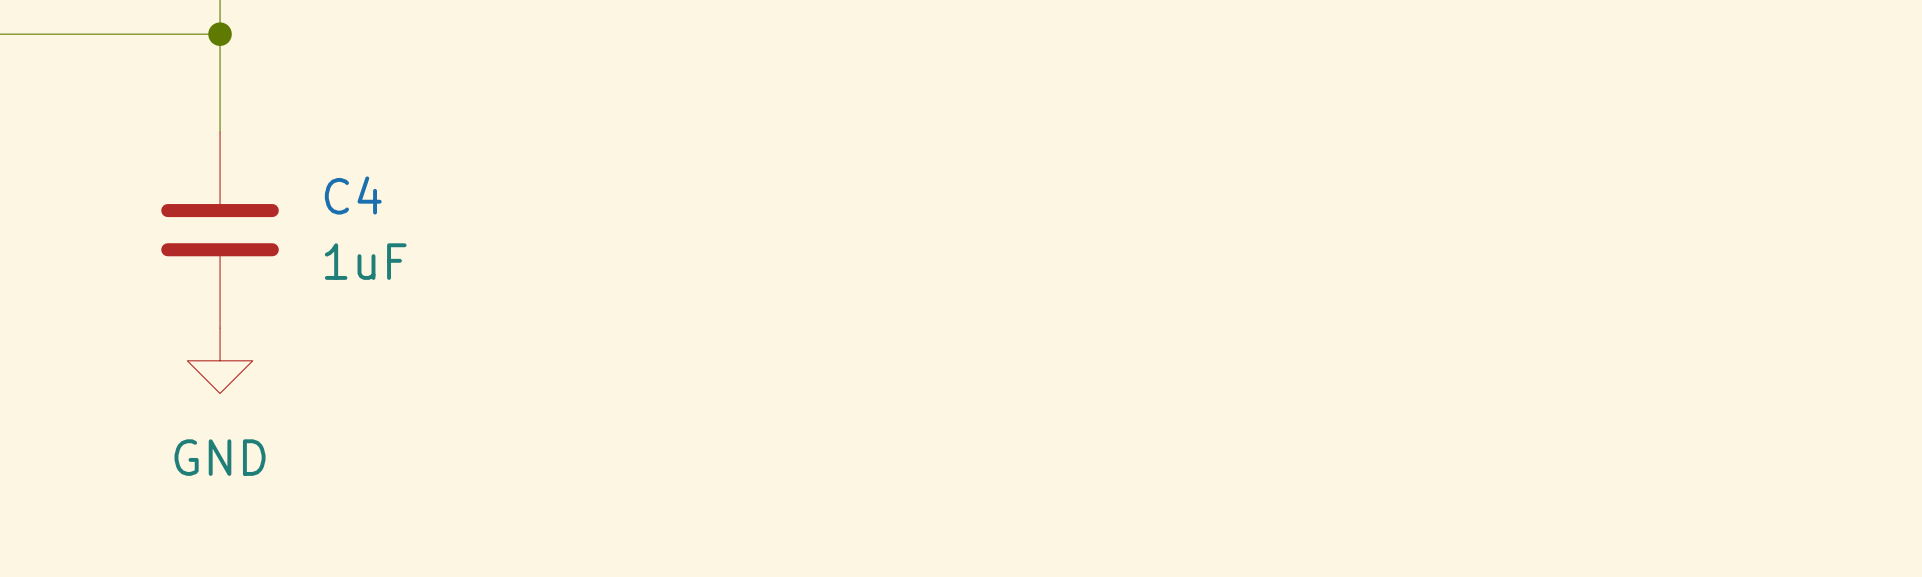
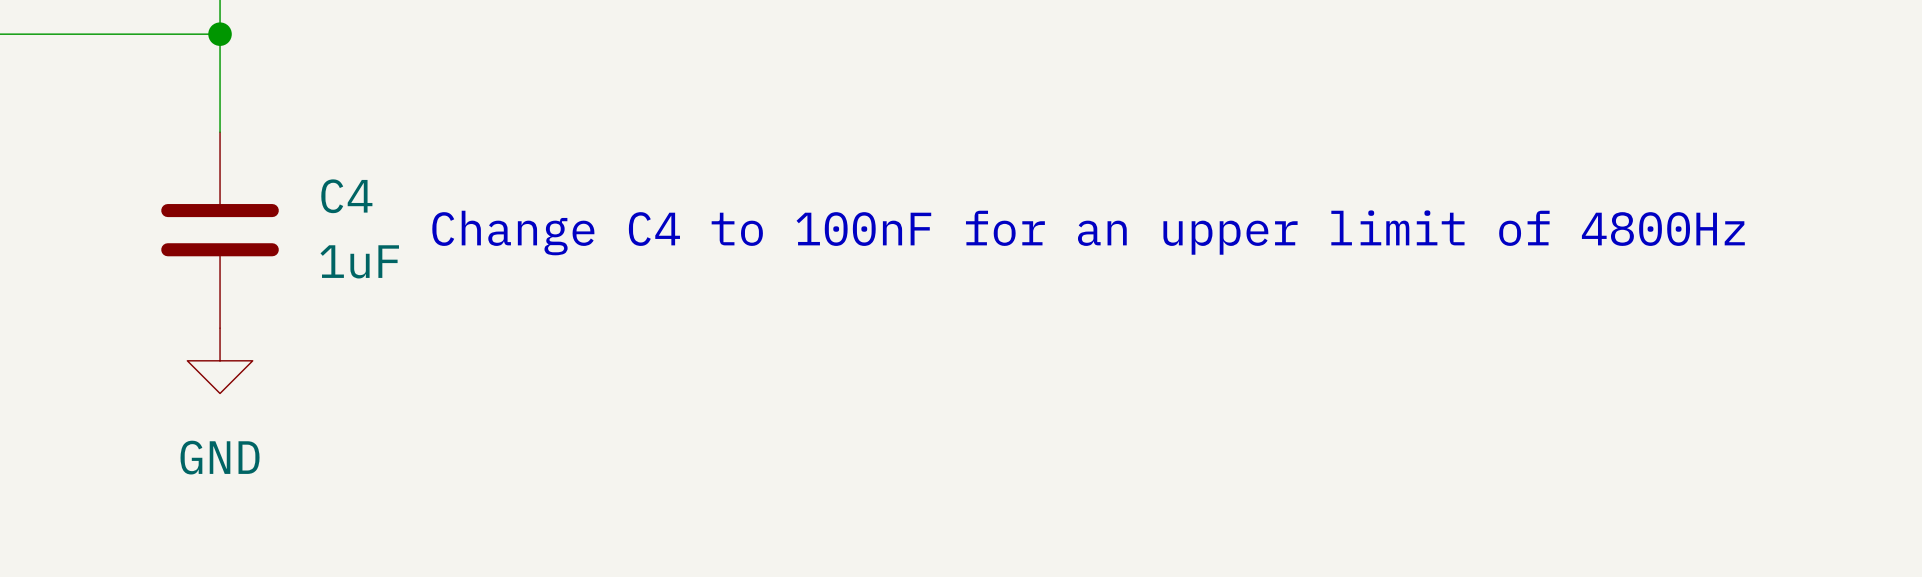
text: none -> Change C4 to 100nF for an upper limit of 4800Hz (1088, 232)

